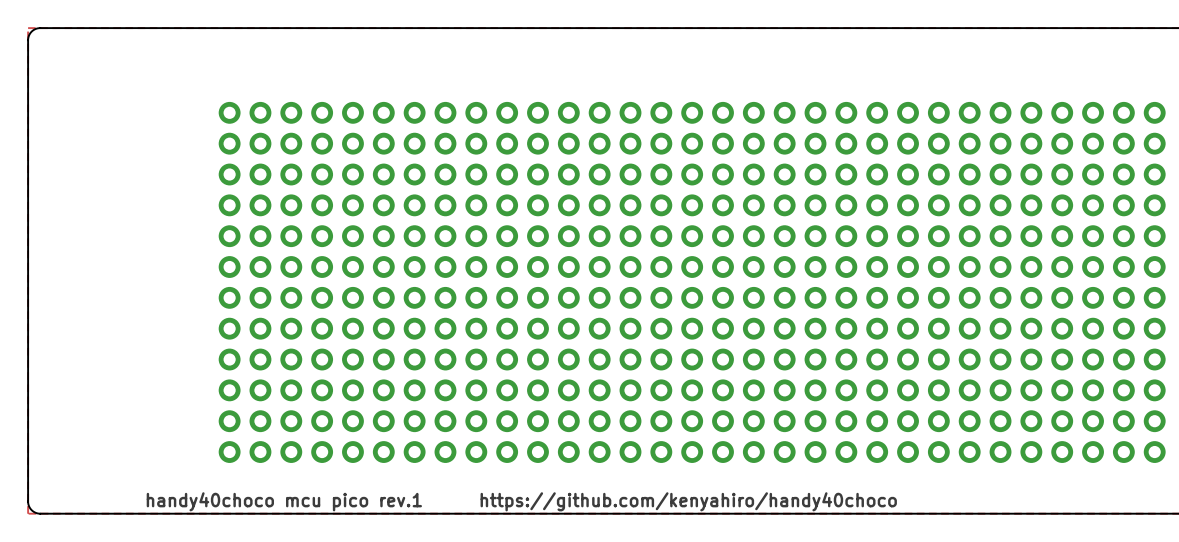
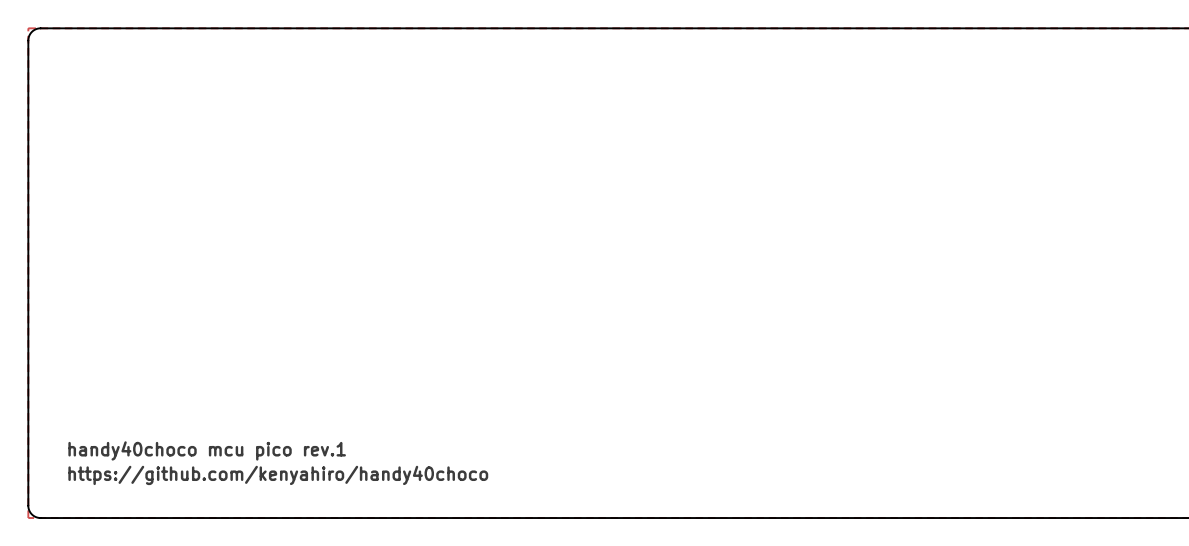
part: (229, 112) -> none
part: (260, 112) -> none
part: (291, 112) -> none
part: (322, 112) -> none
part: (352, 112) -> none
part: (383, 112) -> none
part: (414, 112) -> none
part: (445, 112) -> none
part: (476, 112) -> none
part: (507, 112) -> none
part: (537, 112) -> none
part: (568, 112) -> none
part: (599, 112) -> none
part: (630, 112) -> none
part: (661, 112) -> none
part: (692, 112) -> none
part: (723, 112) -> none
part: (753, 112) -> none
part: (784, 112) -> none
part: (815, 112) -> none
part: (846, 112) -> none
part: (877, 112) -> none
part: (908, 112) -> none
part: (938, 112) -> none
part: (969, 112) -> none
part: (1000, 112) -> none
part: (1031, 112) -> none
part: (1062, 112) -> none
part: (1093, 112) -> none
part: (1123, 112) -> none
part: (1154, 112) -> none
part: (229, 143) -> none
part: (260, 143) -> none
part: (291, 143) -> none
part: (322, 143) -> none
part: (352, 143) -> none
part: (383, 143) -> none
part: (414, 143) -> none
part: (445, 143) -> none
part: (476, 143) -> none
part: (507, 143) -> none
part: (537, 143) -> none
part: (568, 143) -> none
part: (599, 143) -> none
part: (630, 143) -> none
part: (661, 143) -> none
part: (692, 143) -> none
part: (723, 143) -> none
part: (753, 143) -> none
part: (784, 143) -> none
part: (815, 143) -> none
part: (846, 143) -> none
part: (877, 143) -> none
part: (908, 143) -> none
part: (938, 143) -> none
part: (969, 143) -> none
part: (1000, 143) -> none
part: (1031, 143) -> none
part: (1062, 143) -> none
part: (1093, 143) -> none
part: (1123, 143) -> none
part: (1154, 143) -> none
part: (229, 174) -> none
part: (260, 174) -> none
part: (291, 174) -> none
part: (322, 174) -> none
part: (352, 174) -> none
part: (383, 174) -> none
part: (414, 174) -> none
part: (445, 174) -> none
part: (476, 174) -> none
part: (507, 174) -> none
part: (537, 174) -> none
part: (568, 174) -> none
part: (599, 174) -> none
part: (630, 174) -> none
part: (661, 174) -> none
part: (692, 174) -> none
part: (723, 174) -> none
part: (753, 174) -> none
part: (784, 174) -> none
part: (815, 174) -> none
part: (846, 174) -> none
part: (877, 174) -> none
part: (908, 174) -> none
part: (938, 174) -> none
part: (969, 174) -> none
part: (1000, 174) -> none
part: (1031, 174) -> none
part: (1062, 174) -> none
part: (1093, 174) -> none
part: (1123, 174) -> none
part: (1154, 174) -> none
part: (229, 205) -> none
part: (260, 205) -> none
part: (291, 205) -> none
part: (322, 205) -> none
part: (352, 205) -> none
part: (383, 205) -> none
part: (414, 205) -> none
part: (445, 205) -> none
part: (476, 205) -> none
part: (507, 205) -> none
part: (537, 205) -> none
part: (568, 205) -> none
part: (599, 205) -> none
part: (630, 205) -> none
part: (661, 205) -> none
part: (692, 205) -> none
part: (723, 205) -> none
part: (753, 205) -> none
part: (784, 205) -> none
part: (815, 205) -> none
part: (846, 205) -> none
part: (877, 205) -> none
part: (908, 205) -> none
part: (938, 205) -> none
part: (969, 205) -> none
part: (1000, 205) -> none
part: (1031, 205) -> none
part: (1062, 205) -> none
part: (1093, 205) -> none
part: (1123, 205) -> none
part: (1154, 205) -> none
part: (229, 236) -> none
part: (260, 236) -> none
part: (291, 236) -> none
part: (322, 236) -> none
part: (352, 236) -> none
part: (383, 236) -> none
part: (414, 236) -> none
part: (445, 236) -> none
part: (476, 236) -> none
part: (507, 236) -> none
part: (537, 236) -> none
part: (568, 236) -> none
part: (599, 236) -> none
part: (630, 236) -> none
part: (661, 236) -> none
part: (692, 236) -> none
part: (723, 236) -> none
part: (753, 236) -> none
part: (784, 236) -> none
part: (815, 236) -> none
part: (846, 236) -> none
part: (877, 236) -> none
part: (908, 236) -> none
part: (938, 236) -> none
part: (969, 236) -> none
part: (1000, 236) -> none
part: (1031, 236) -> none
part: (1062, 236) -> none
part: (1093, 236) -> none
part: (1123, 236) -> none
part: (1154, 236) -> none
part: (229, 267) -> none
part: (260, 267) -> none
part: (291, 267) -> none
part: (322, 267) -> none
part: (352, 267) -> none
part: (383, 267) -> none
part: (414, 267) -> none
part: (445, 267) -> none
part: (476, 267) -> none
part: (507, 267) -> none
part: (537, 267) -> none
part: (568, 267) -> none
part: (599, 267) -> none
part: (630, 267) -> none
part: (661, 267) -> none
part: (692, 267) -> none
part: (723, 267) -> none
part: (753, 267) -> none
part: (784, 267) -> none
part: (815, 267) -> none
part: (846, 267) -> none
part: (877, 267) -> none
part: (908, 267) -> none
part: (938, 267) -> none
part: (969, 267) -> none
part: (1000, 267) -> none
part: (1031, 267) -> none
part: (1062, 267) -> none
part: (1093, 267) -> none
part: (1123, 267) -> none
part: (1154, 267) -> none
part: (229, 297) -> none
part: (260, 297) -> none
part: (291, 297) -> none
part: (322, 297) -> none
part: (352, 297) -> none
part: (383, 297) -> none
part: (414, 297) -> none
part: (445, 297) -> none
part: (476, 297) -> none
part: (507, 297) -> none
part: (537, 297) -> none
part: (568, 297) -> none
part: (599, 297) -> none
part: (630, 297) -> none
part: (661, 297) -> none
part: (692, 297) -> none
part: (723, 297) -> none
part: (753, 297) -> none
part: (784, 297) -> none
part: (815, 297) -> none
part: (846, 297) -> none
part: (877, 297) -> none
part: (908, 297) -> none
part: (938, 297) -> none
part: (969, 297) -> none
part: (1000, 297) -> none
part: (1031, 297) -> none
part: (1062, 297) -> none
part: (1093, 297) -> none
part: (1123, 297) -> none
part: (1154, 297) -> none
part: (229, 328) -> none
part: (260, 328) -> none
part: (291, 328) -> none
part: (322, 328) -> none
part: (352, 328) -> none
part: (383, 328) -> none
part: (414, 328) -> none
part: (445, 328) -> none
part: (476, 328) -> none
part: (507, 328) -> none
part: (537, 328) -> none
part: (568, 328) -> none
part: (599, 328) -> none
part: (630, 328) -> none
part: (661, 328) -> none
part: (692, 328) -> none
part: (723, 328) -> none
part: (753, 328) -> none
part: (784, 328) -> none
part: (815, 328) -> none
part: (846, 328) -> none
part: (877, 328) -> none
part: (908, 328) -> none
part: (938, 328) -> none
part: (969, 328) -> none
part: (1000, 328) -> none
part: (1031, 328) -> none
part: (1062, 328) -> none
part: (1093, 328) -> none
part: (1123, 328) -> none
part: (1154, 328) -> none
part: (229, 359) -> none
part: (260, 359) -> none
part: (291, 359) -> none
part: (322, 359) -> none
part: (352, 359) -> none
part: (383, 359) -> none
part: (414, 359) -> none
part: (445, 359) -> none
part: (476, 359) -> none
part: (507, 359) -> none
part: (537, 359) -> none
part: (568, 359) -> none
part: (599, 359) -> none
part: (630, 359) -> none
part: (661, 359) -> none
part: (692, 359) -> none
part: (723, 359) -> none
part: (753, 359) -> none
part: (784, 359) -> none
part: (815, 359) -> none
part: (846, 359) -> none
part: (877, 359) -> none
part: (908, 359) -> none
part: (938, 359) -> none
part: (969, 359) -> none
part: (1000, 359) -> none
part: (1031, 359) -> none
part: (1062, 359) -> none
part: (1093, 359) -> none
part: (1123, 359) -> none
part: (1154, 359) -> none
part: (229, 390) -> none
part: (260, 390) -> none
part: (291, 390) -> none
part: (322, 390) -> none
part: (352, 390) -> none
part: (383, 390) -> none
part: (414, 390) -> none
part: (445, 390) -> none
part: (476, 390) -> none
part: (507, 390) -> none
part: (537, 390) -> none
part: (568, 390) -> none
part: (599, 390) -> none
part: (630, 390) -> none
part: (661, 390) -> none
part: (692, 390) -> none
part: (723, 390) -> none
part: (753, 390) -> none
part: (784, 390) -> none
part: (815, 390) -> none
part: (846, 390) -> none
part: (877, 390) -> none
part: (908, 390) -> none
part: (938, 390) -> none
part: (969, 390) -> none
part: (1000, 390) -> none
part: (1031, 390) -> none
part: (1062, 390) -> none
part: (1093, 390) -> none
part: (1123, 390) -> none
part: (1154, 390) -> none
part: (229, 421) -> none
part: (260, 421) -> none
part: (291, 421) -> none
part: (322, 421) -> none
part: (352, 421) -> none
part: (383, 421) -> none
part: (414, 421) -> none
part: (445, 421) -> none
part: (476, 421) -> none
part: (507, 421) -> none
part: (537, 421) -> none
part: (568, 421) -> none
part: (599, 421) -> none
part: (630, 421) -> none
part: (661, 421) -> none
part: (692, 421) -> none
part: (723, 421) -> none
part: (753, 421) -> none
part: (784, 421) -> none
part: (815, 421) -> none
part: (846, 421) -> none
part: (877, 421) -> none
part: (908, 421) -> none
part: (938, 421) -> none
part: (969, 421) -> none
part: (1000, 421) -> none
part: (1031, 421) -> none
part: (1062, 421) -> none
part: (1093, 421) -> none
part: (1123, 421) -> none
part: (1154, 421) -> none
part: (229, 452) -> none
part: (260, 452) -> none
part: (291, 452) -> none
part: (322, 452) -> none
part: (352, 452) -> none
part: (383, 452) -> none
part: (414, 452) -> none
part: (445, 452) -> none
part: (476, 452) -> none
part: (507, 452) -> none
part: (537, 452) -> none
part: (568, 452) -> none
part: (599, 452) -> none
part: (630, 452) -> none
part: (661, 452) -> none
part: (692, 452) -> none
part: (723, 452) -> none
part: (753, 452) -> none
part: (784, 452) -> none
part: (815, 452) -> none
part: (846, 452) -> none
part: (877, 452) -> none
part: (908, 452) -> none
part: (938, 452) -> none
part: (969, 452) -> none
part: (1000, 452) -> none
part: (1031, 452) -> none
part: (1062, 452) -> none
part: (1093, 452) -> none
part: (1123, 452) -> none
part: (1154, 452) -> none
text: none -> https://github.com/kenyahiro/handy40choco (278, 475)
text position: handy40choco mcu pico rev.1 (284, 501) -> handy40choco mcu pico rev.1 (207, 450)
text: https://github.com/kenyahiro/handy40choco (688, 501) -> none

